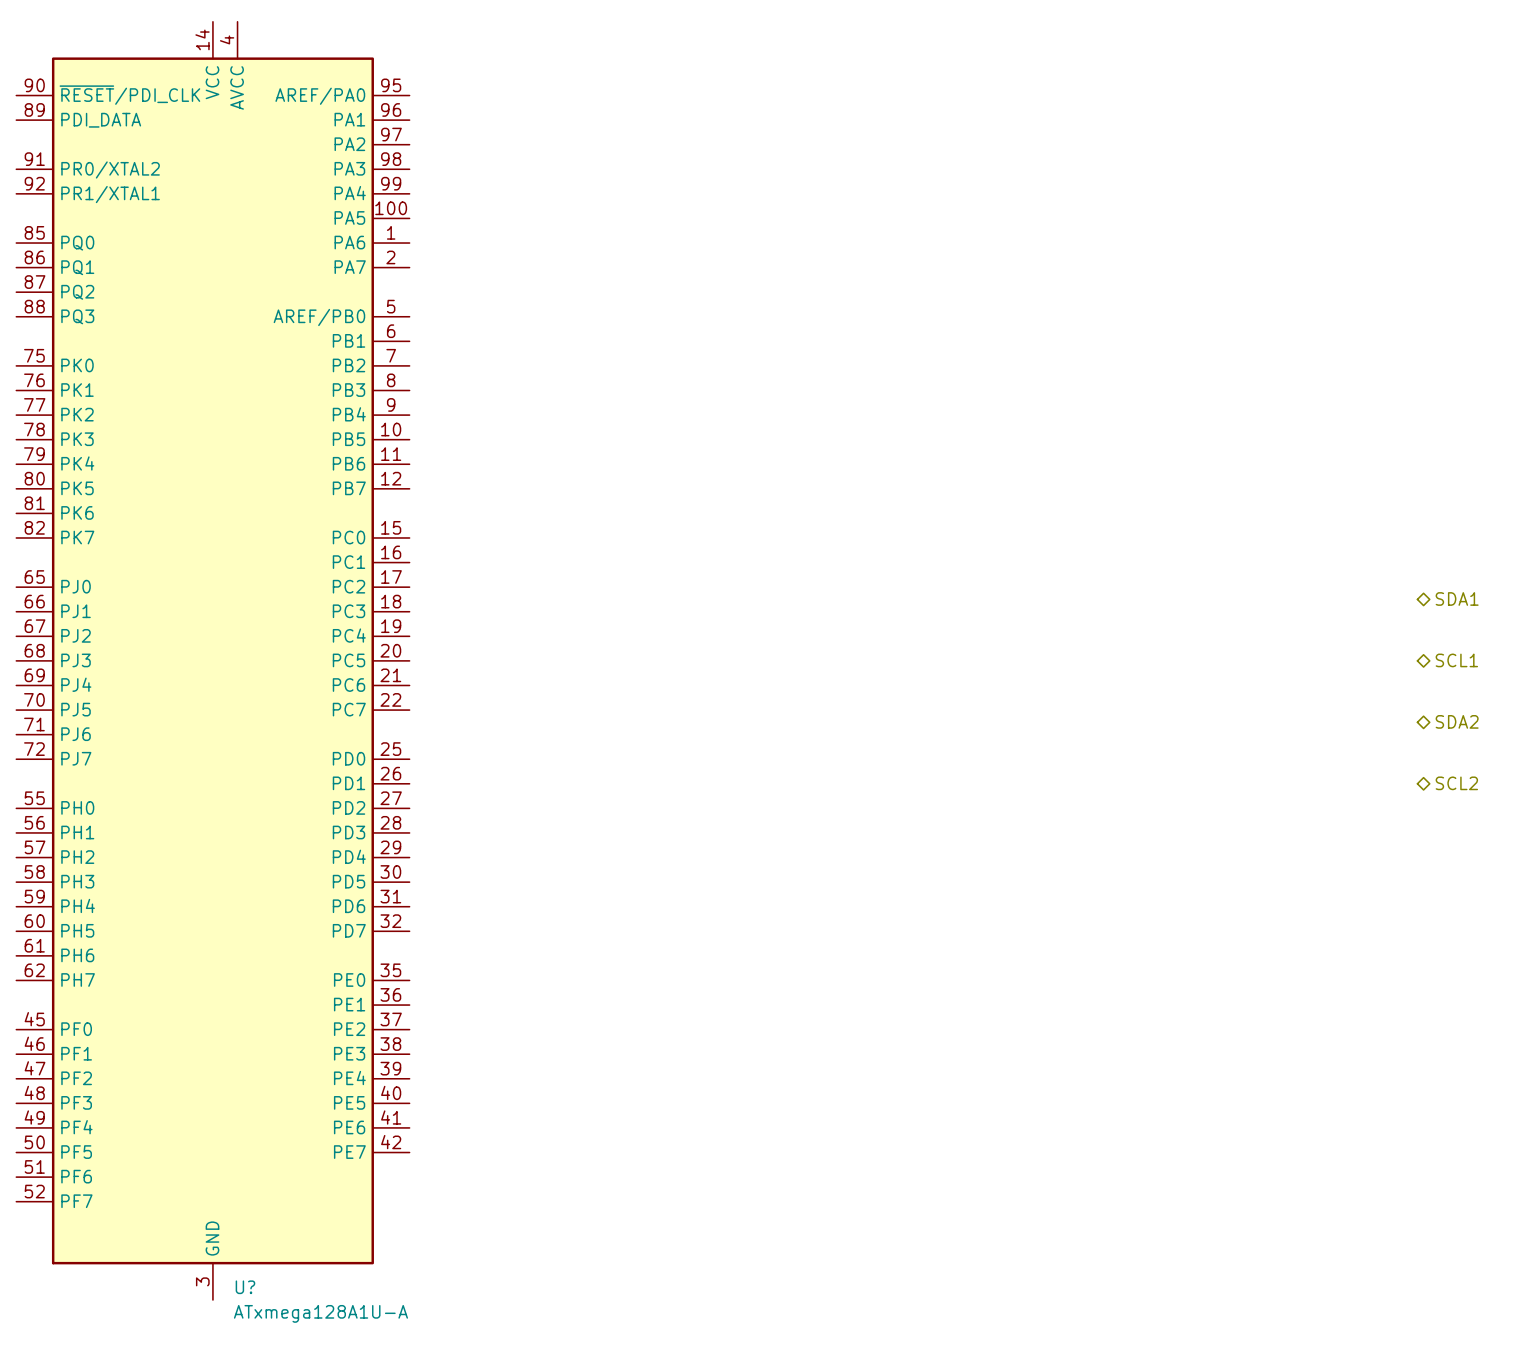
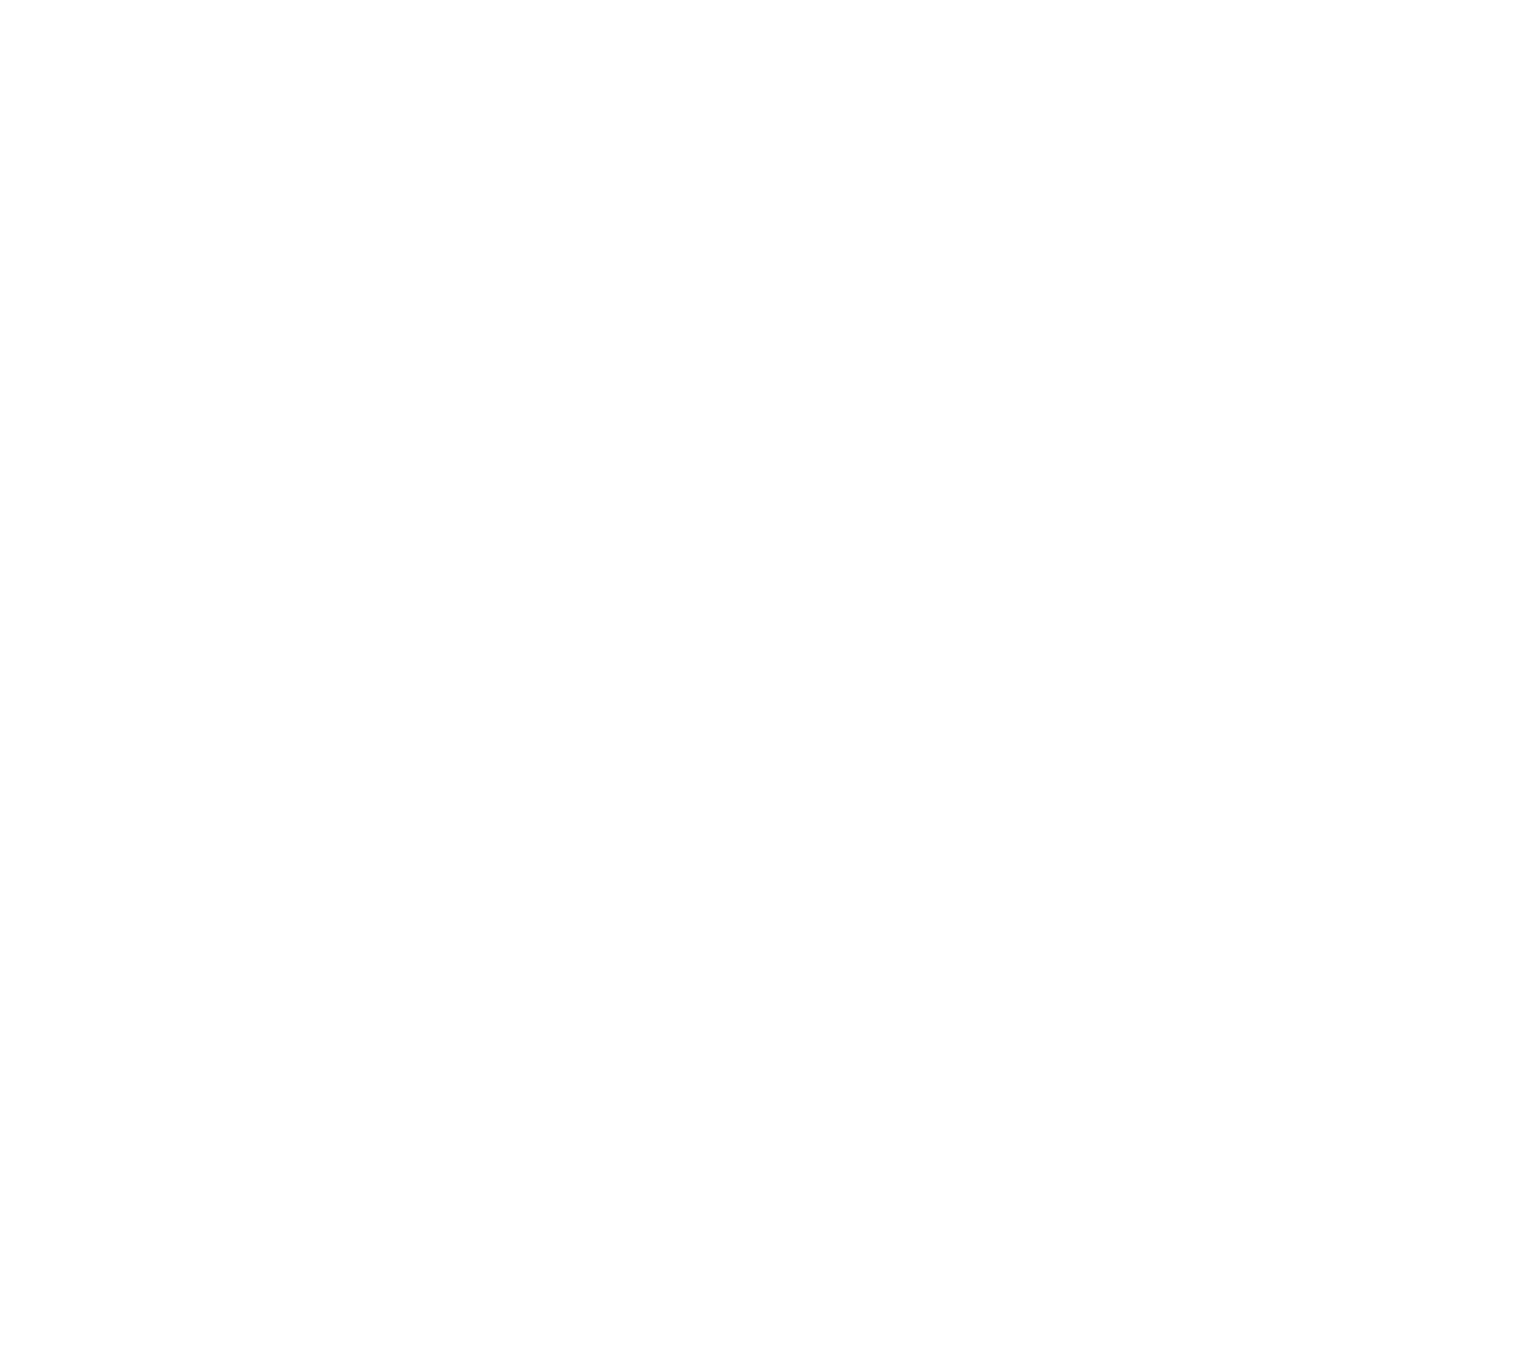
hierarchical label: SDA1 (1457, 598) -> none
U?: ATxmega128A1U-A (212, 660) -> none
hierarchical label: SCL1 (1456, 660) -> none
hierarchical label: SDA2 (1457, 721) -> none
hierarchical label: SCL2 (1456, 783) -> none

